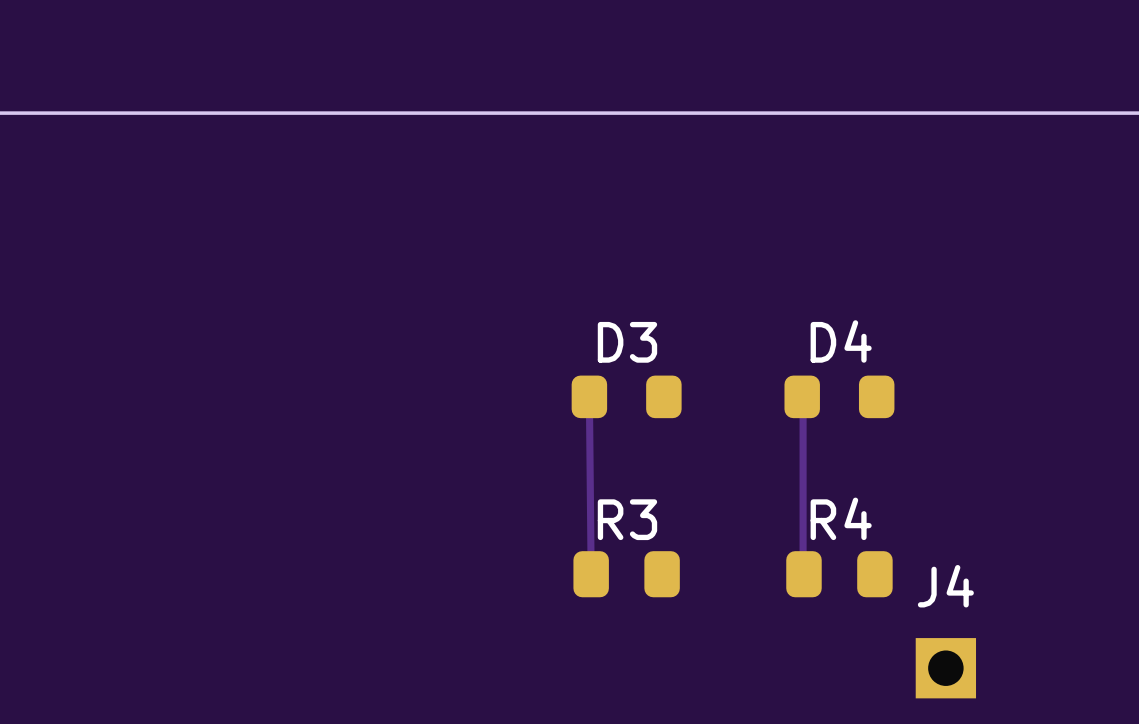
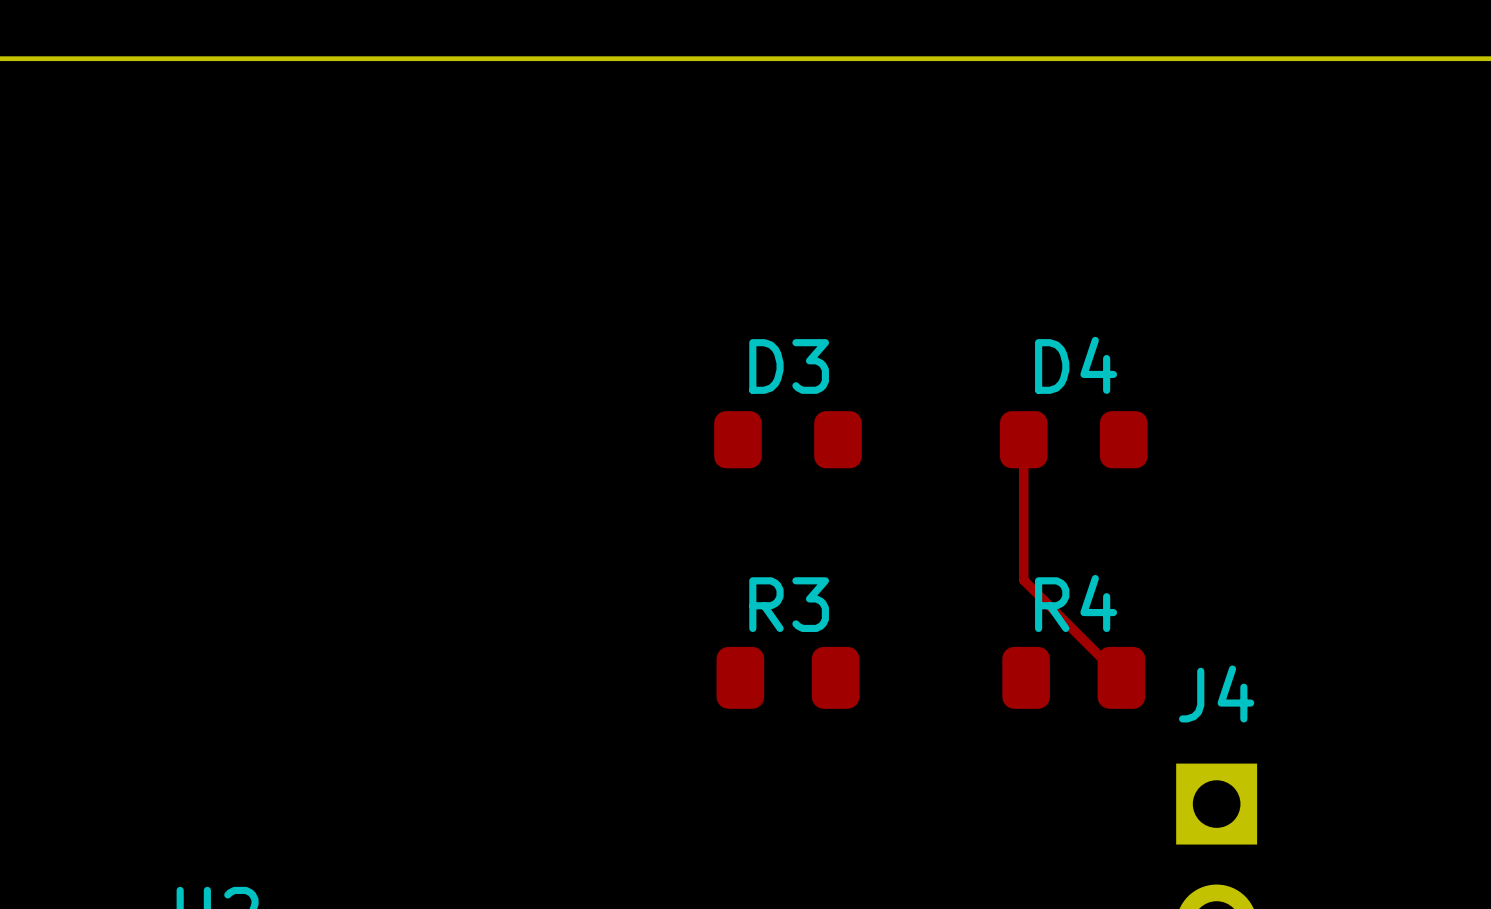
track: (589, 396) (591, 574) -> none
track: (802, 396) (803, 574) -> (1023, 439) (1023, 580) (1121, 677)

